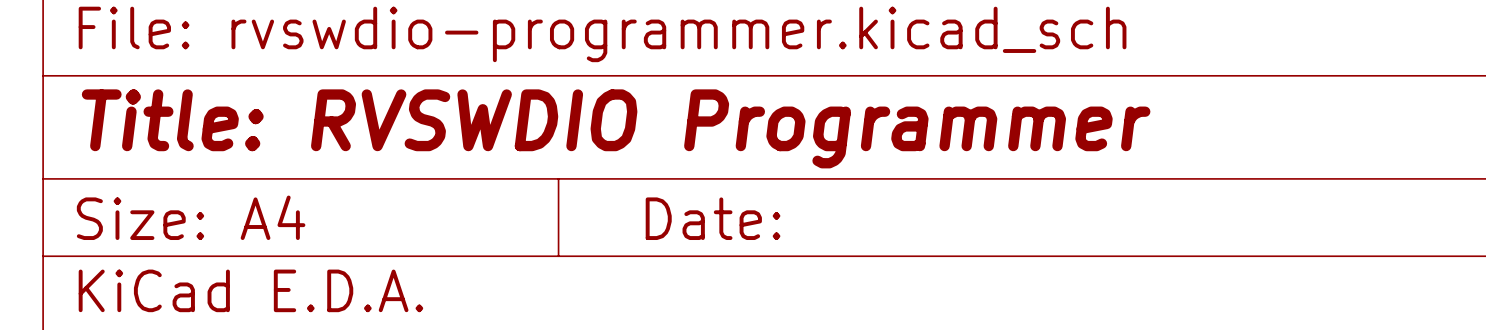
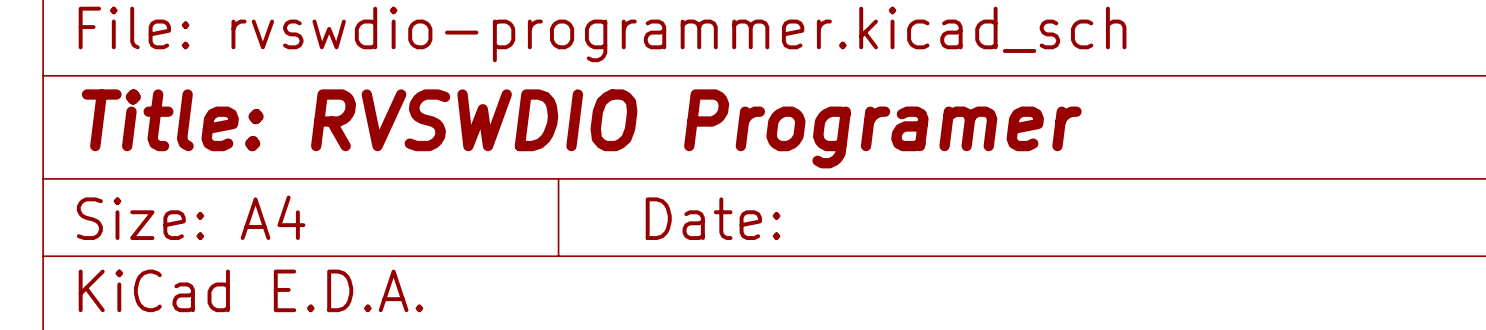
title block: Title: RVSWDIO Programmer (616, 128) -> Title: RVSWDIO Programer (581, 128)

